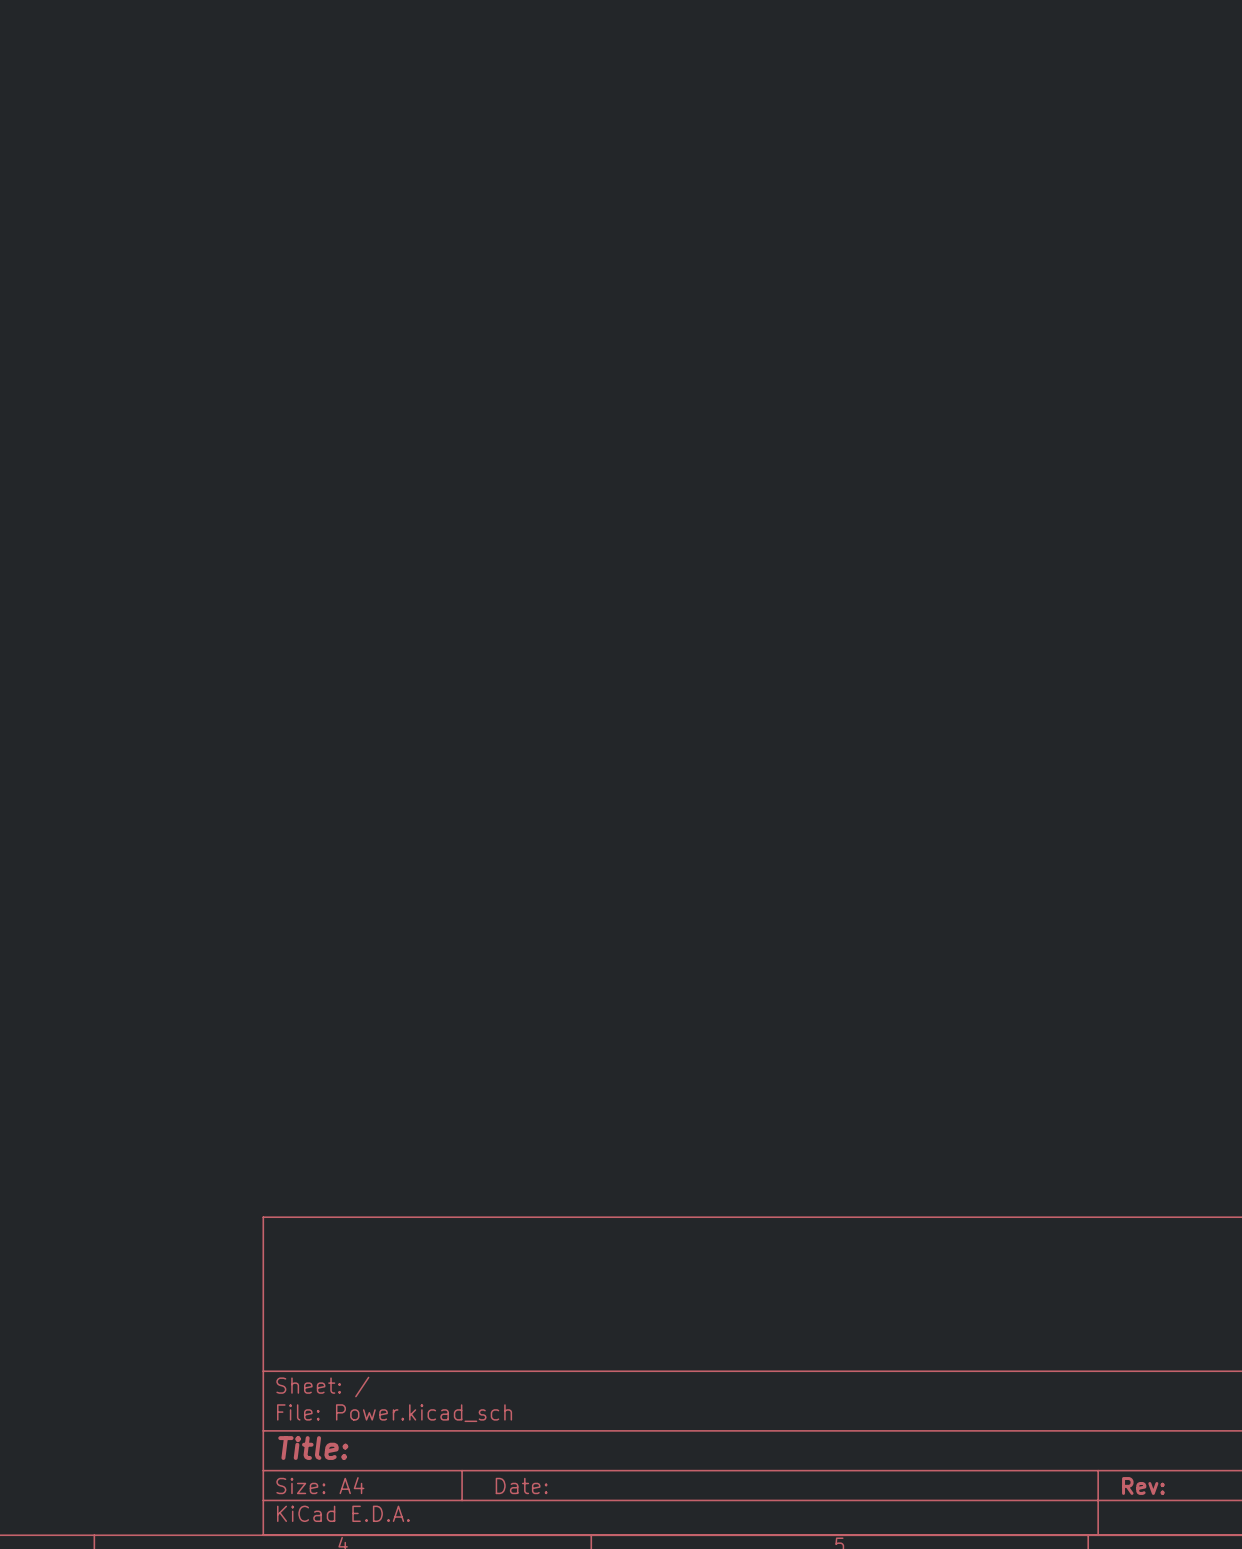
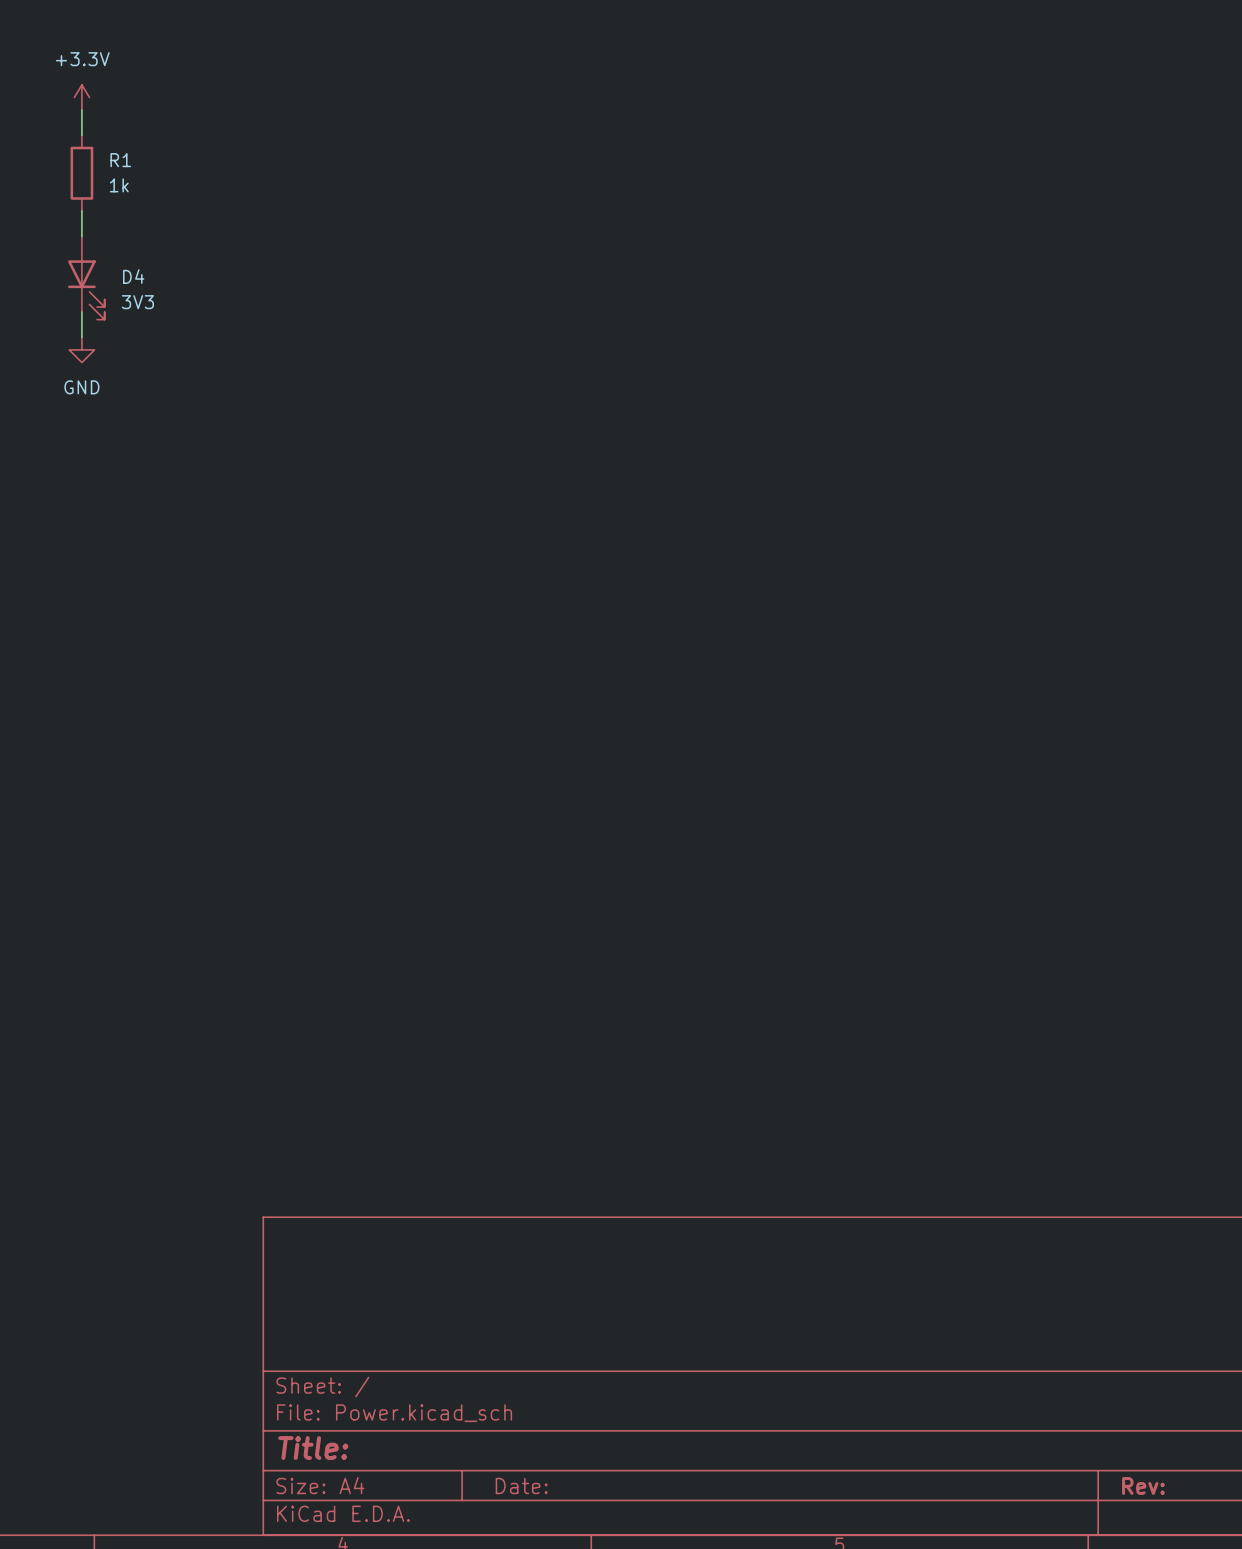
power symbol: none -> +3.3V (81, 97)
wire: none -> (81, 110) (81, 135)
R1: none -> 1k (81, 173)
wire: none -> (81, 211) (81, 236)
D4: none -> 3V3 (86, 278)
wire: none -> (81, 312) (81, 337)
power symbol: none -> GND (81, 349)

